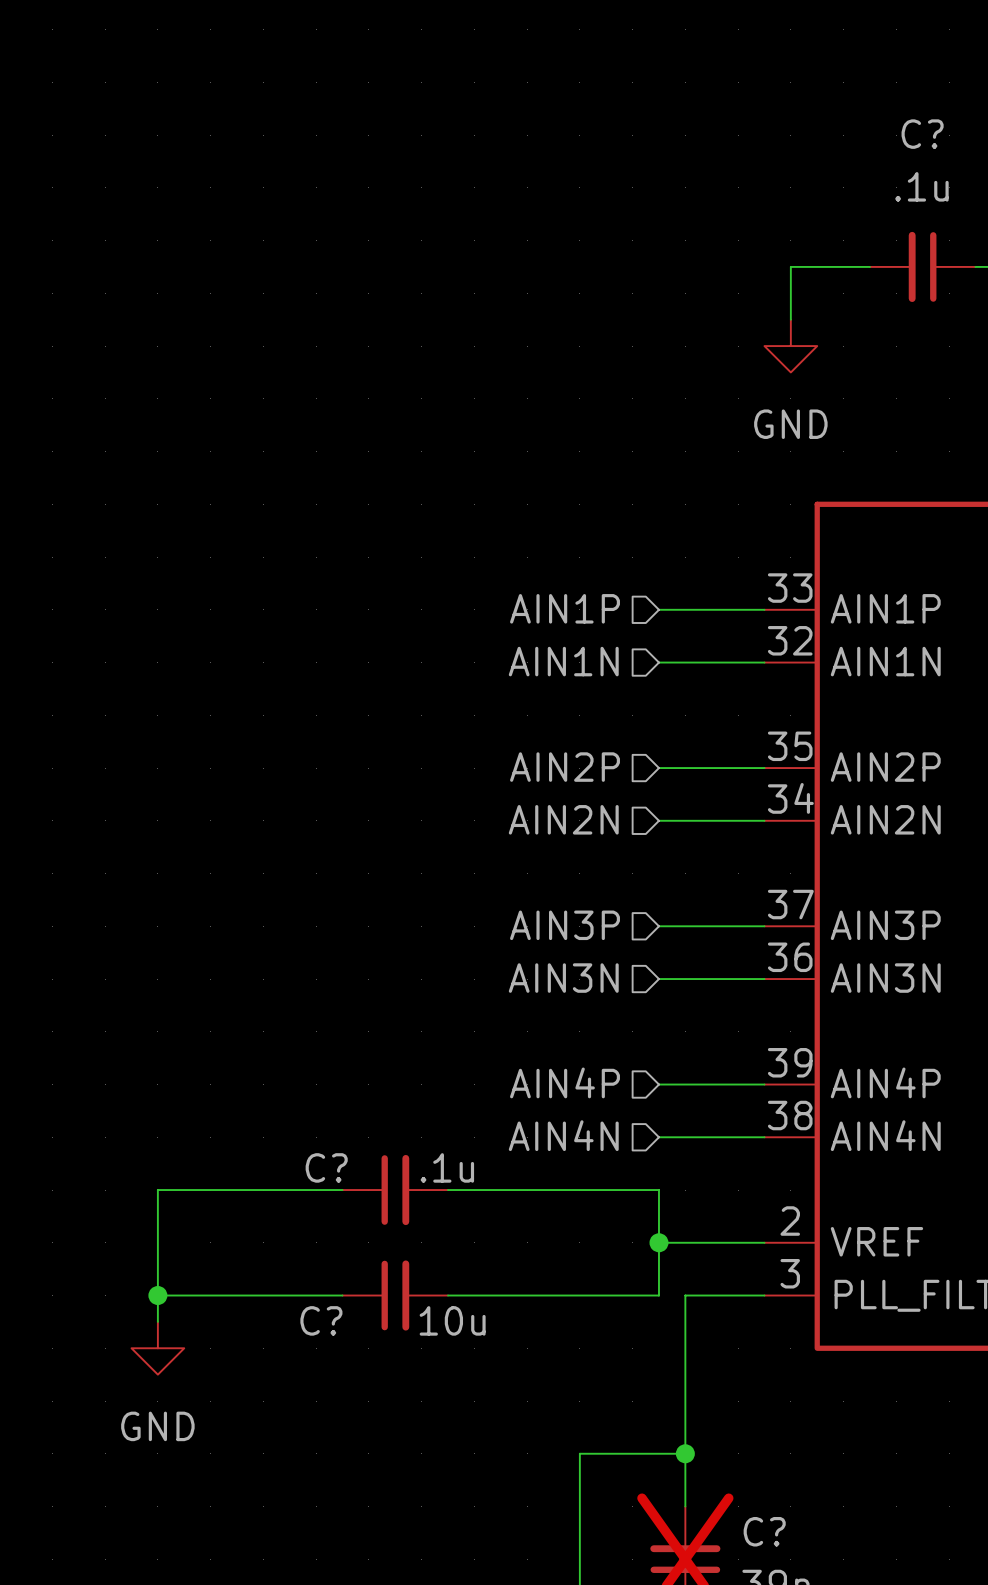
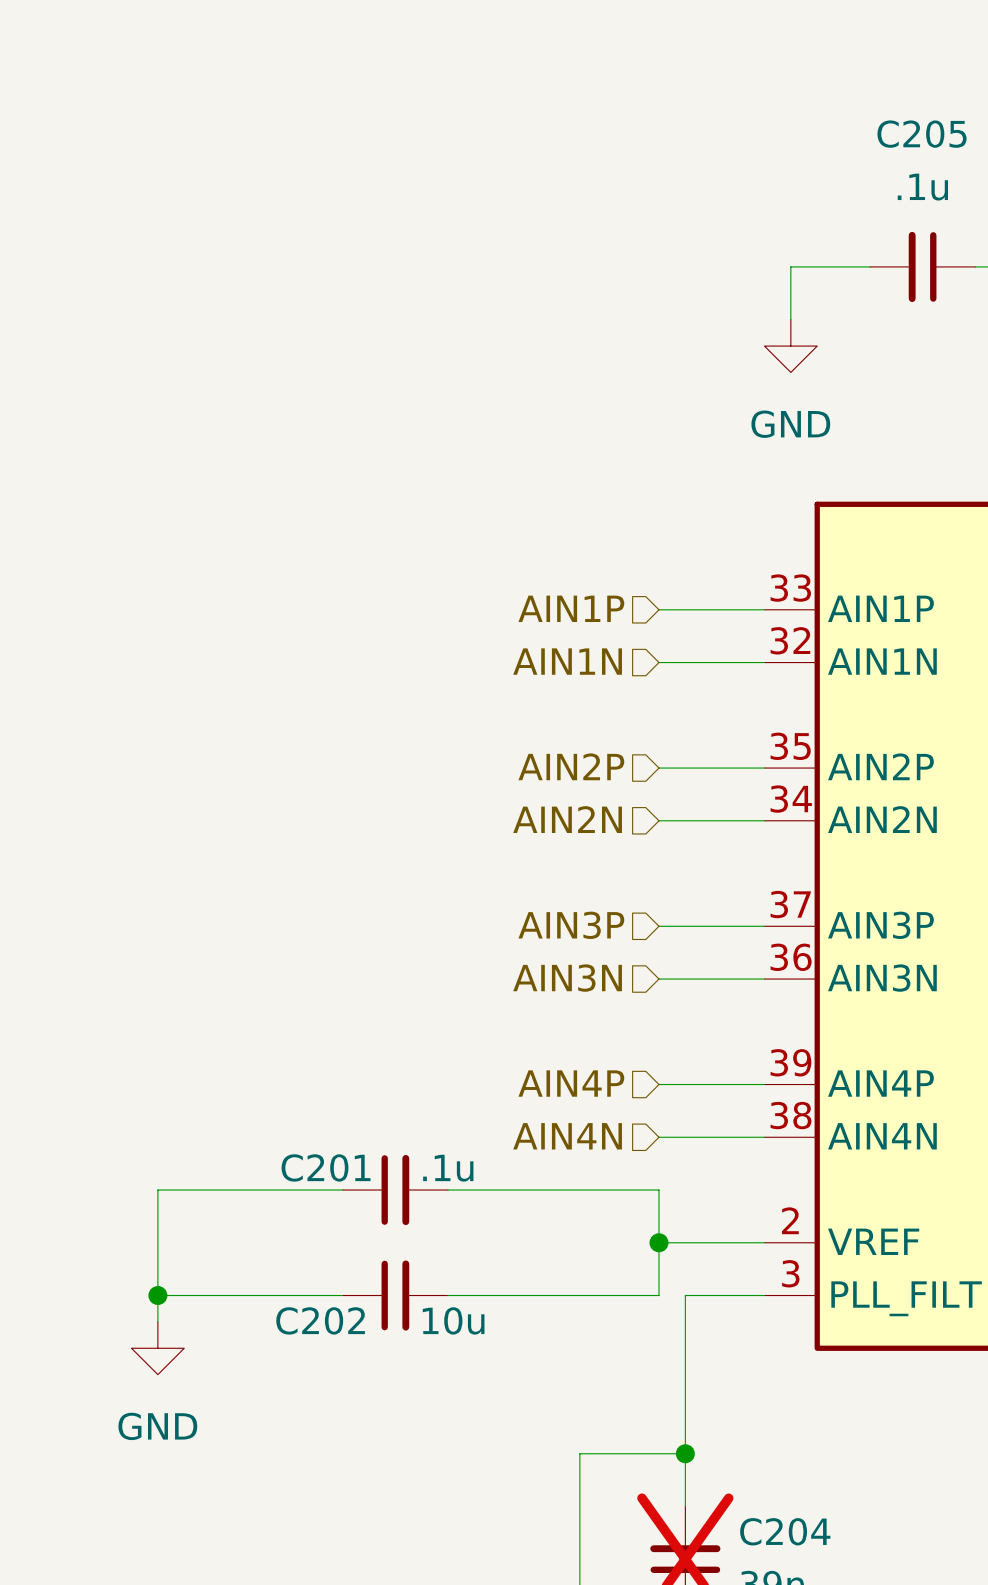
C? name: C? (922, 134) -> C205 (922, 134)
C? name: C? (326, 1167) -> C201 (326, 1167)
C? name: C? (321, 1320) -> C202 (320, 1320)
C? name: C? (764, 1531) -> C204 (785, 1531)

